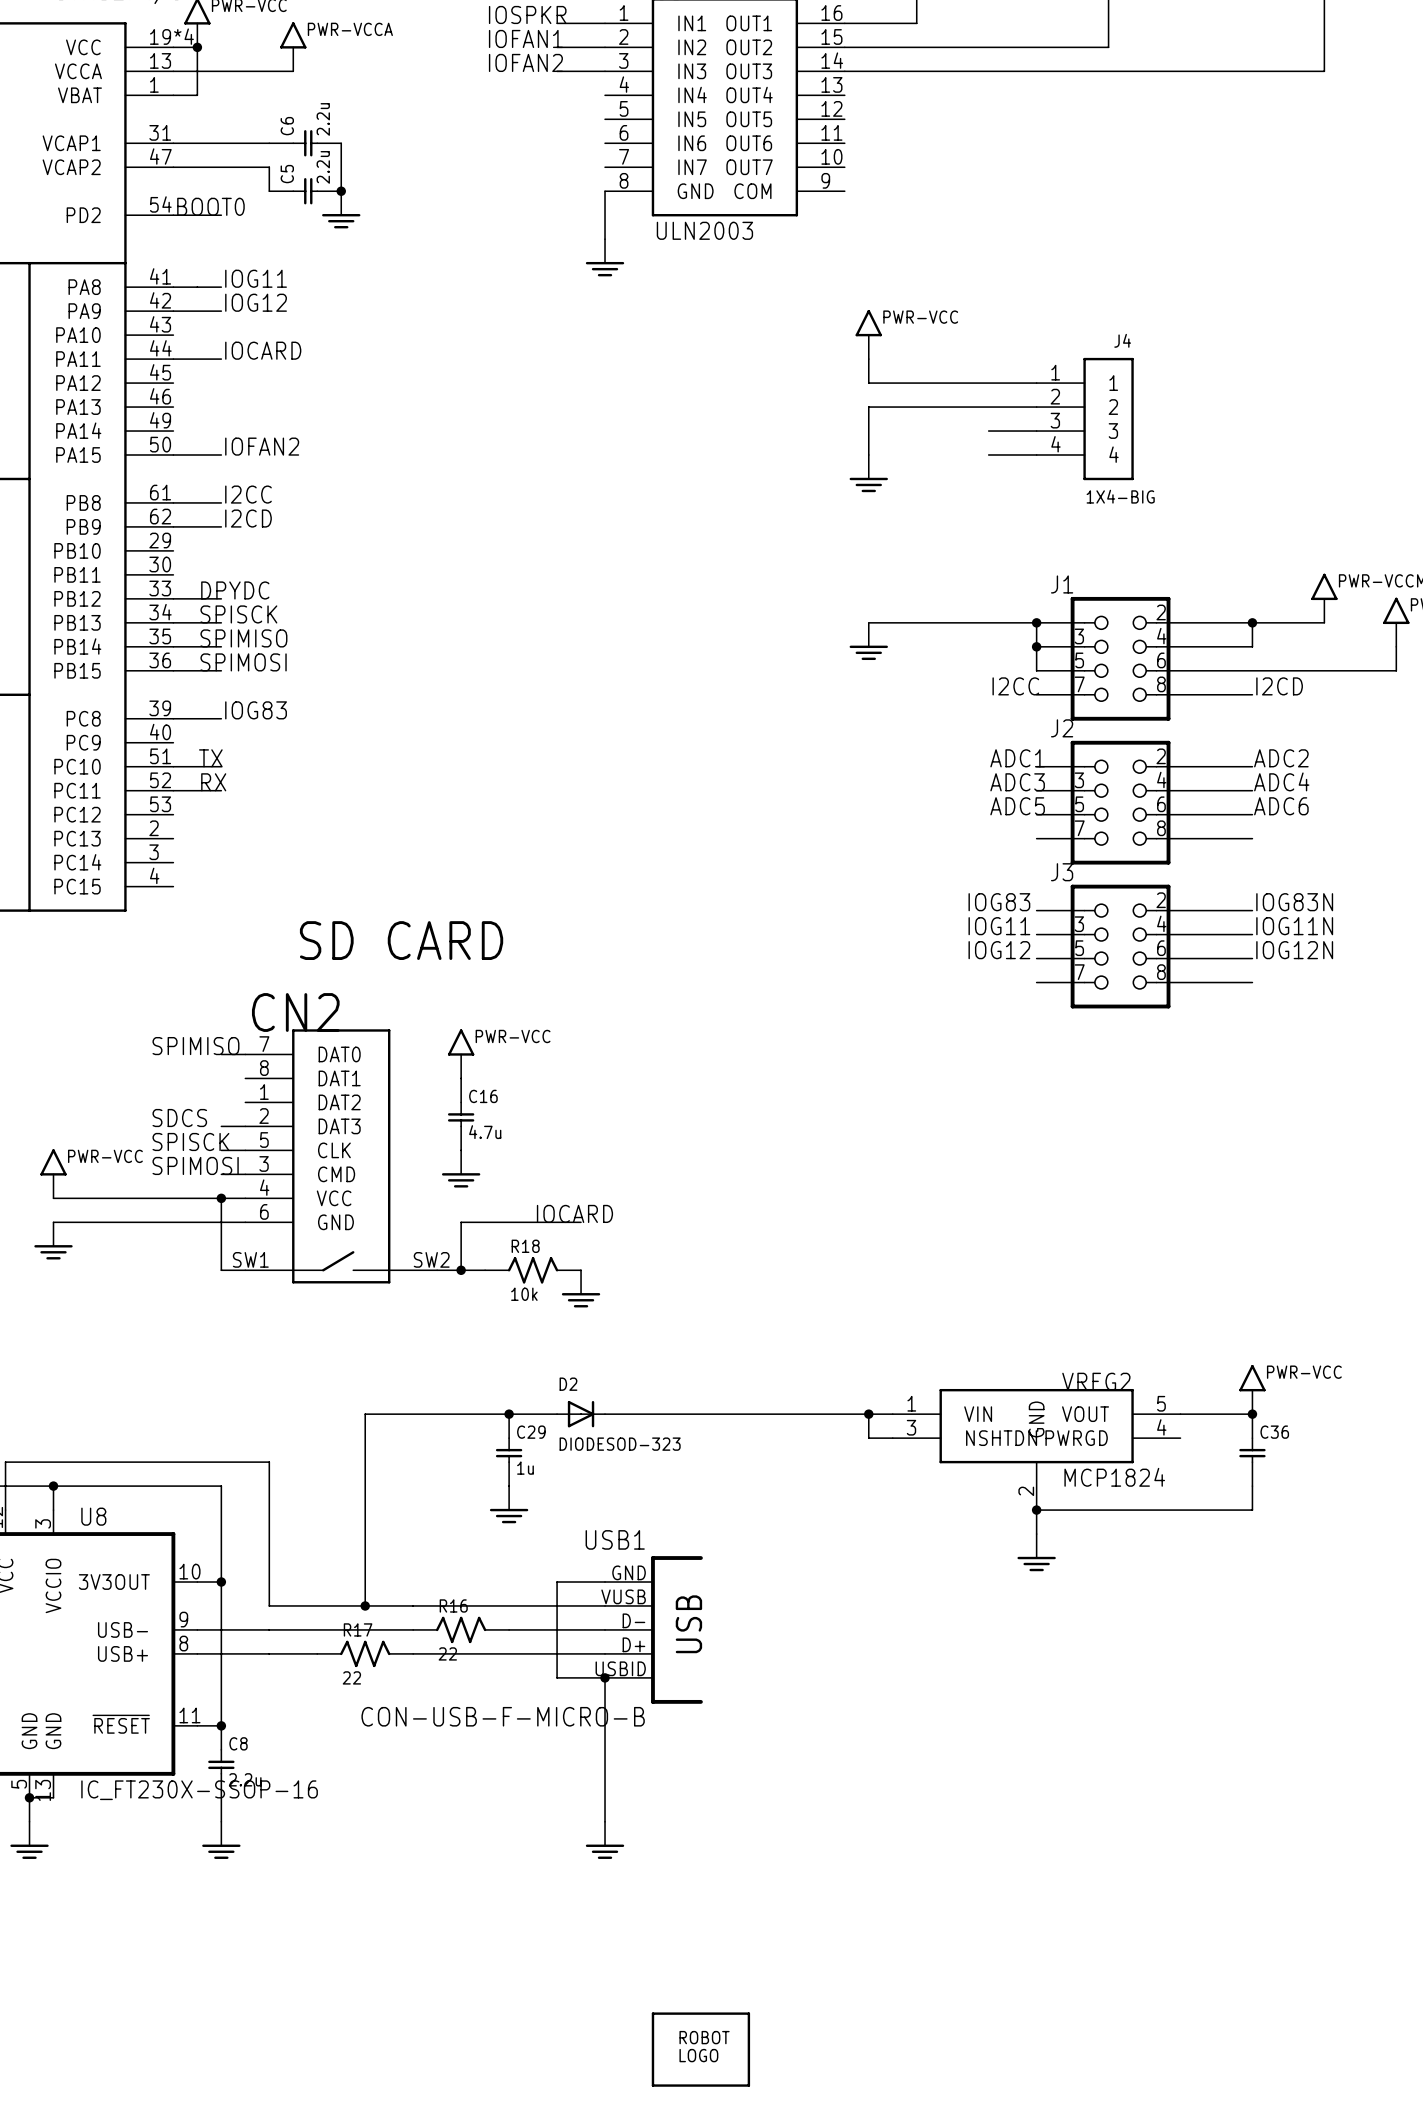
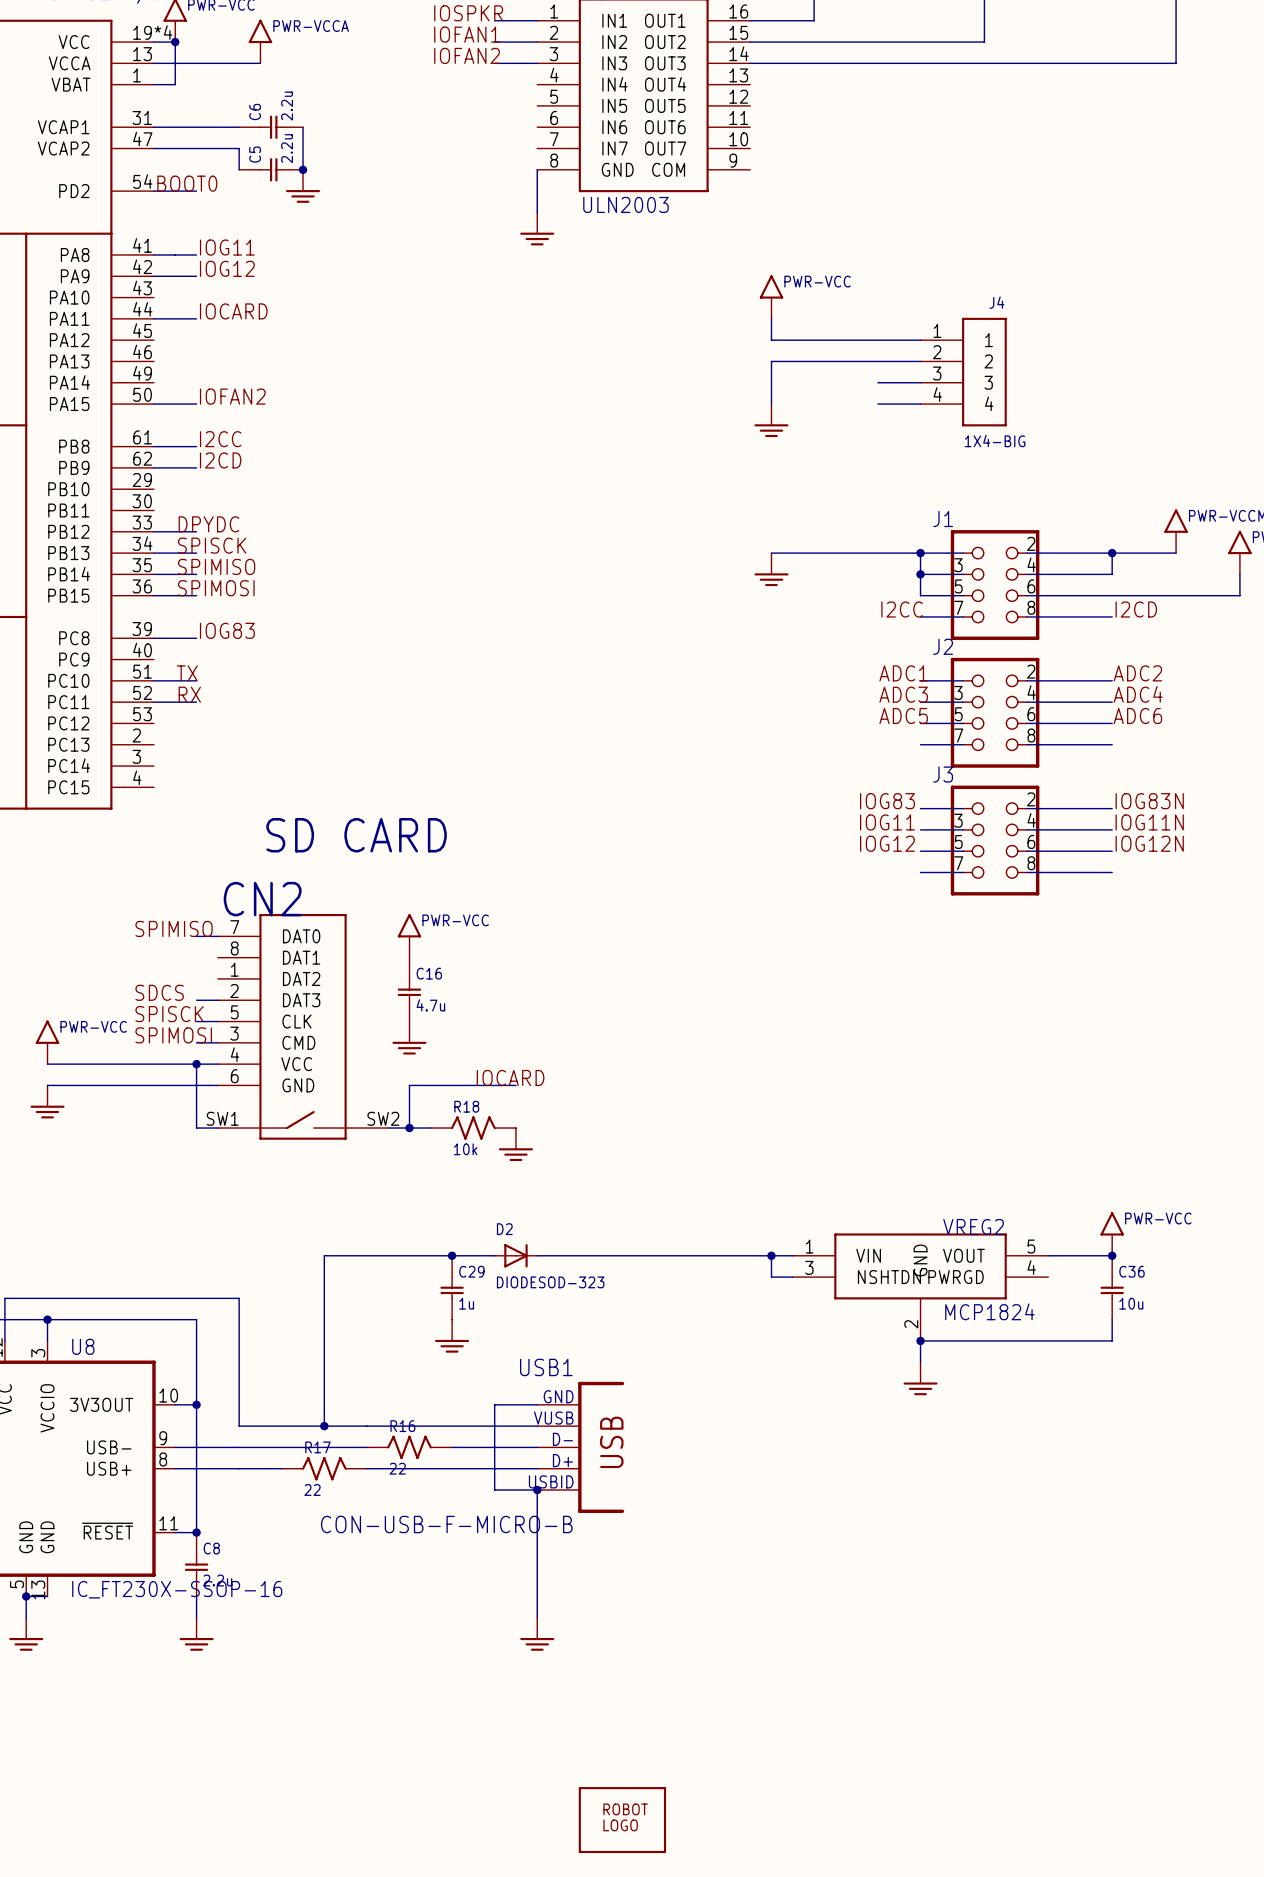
C36 value: none -> 10u (1131, 1303)

